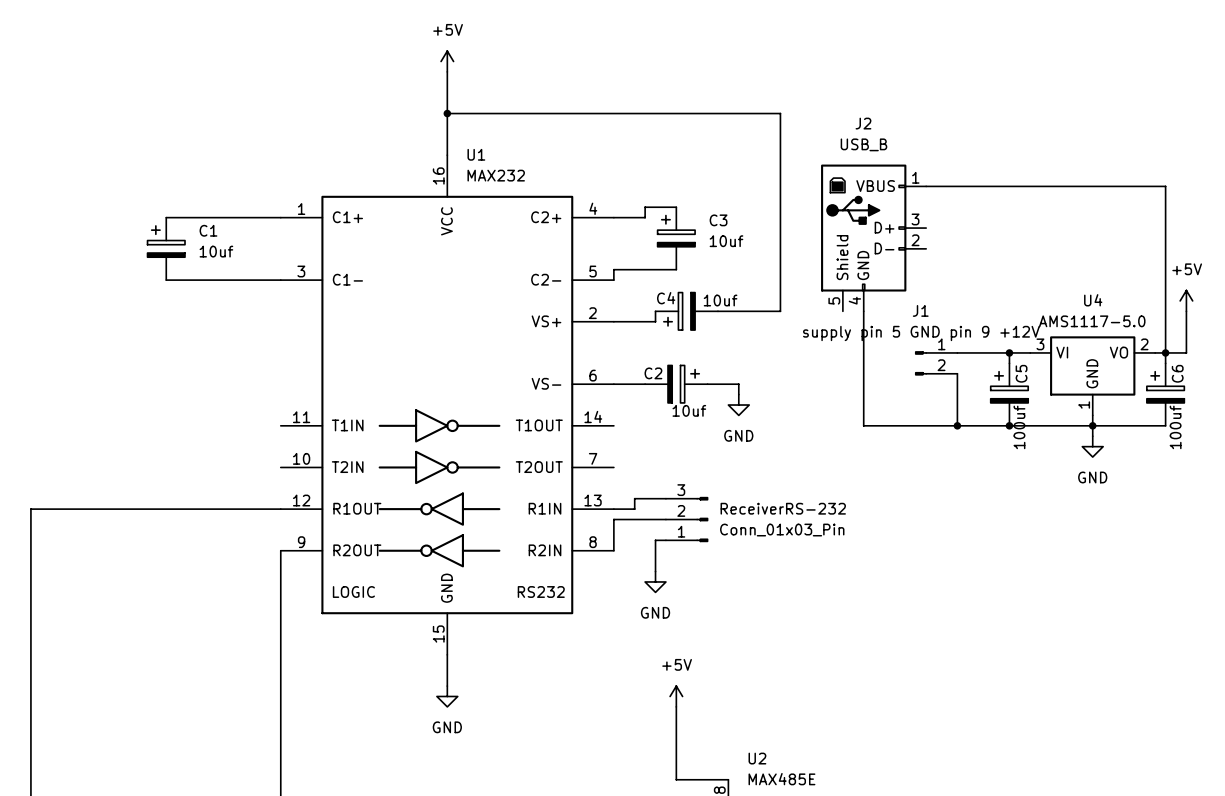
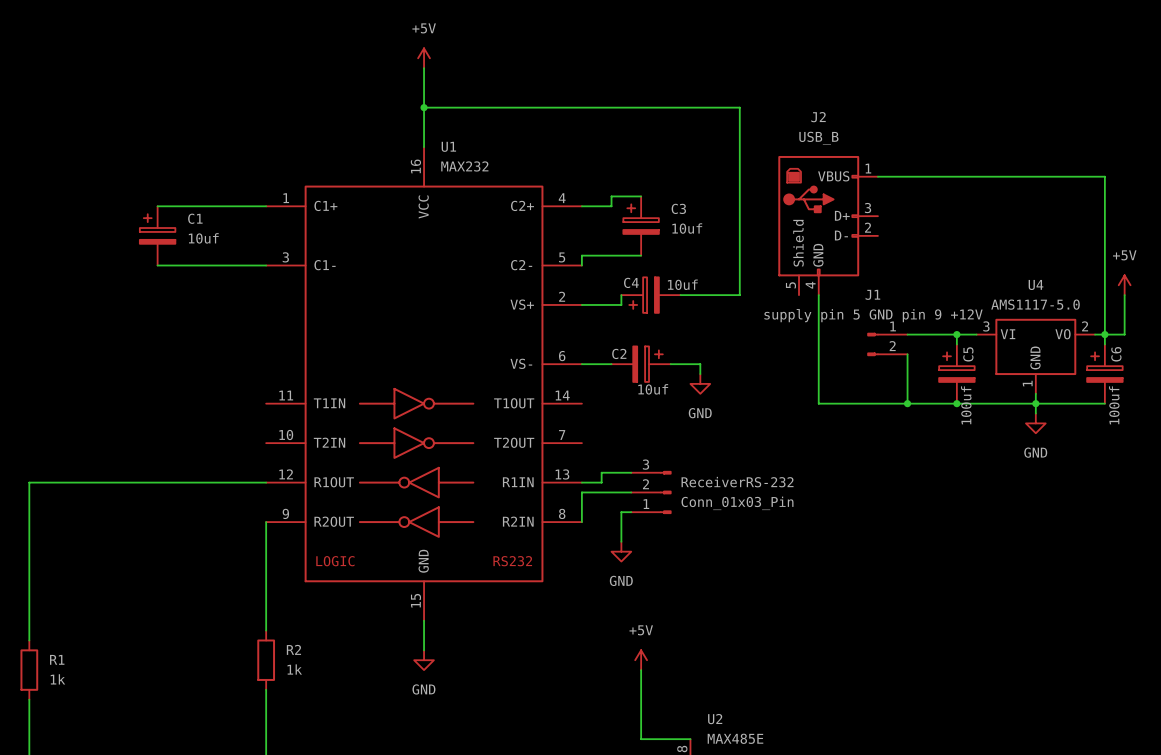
wire: (280, 665) (280, 727) -> none
wire: (30, 675) (30, 738) -> none
R2: none -> 1k (266, 660)
R1: none -> 1k (29, 670)

